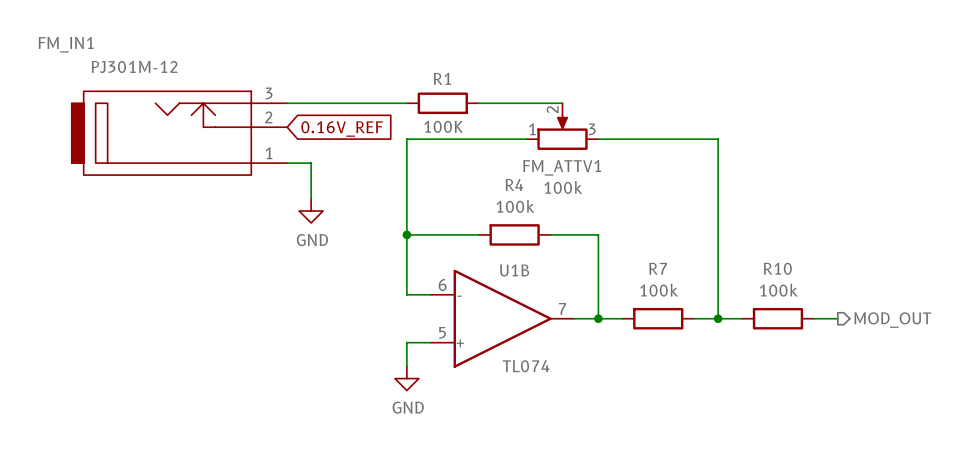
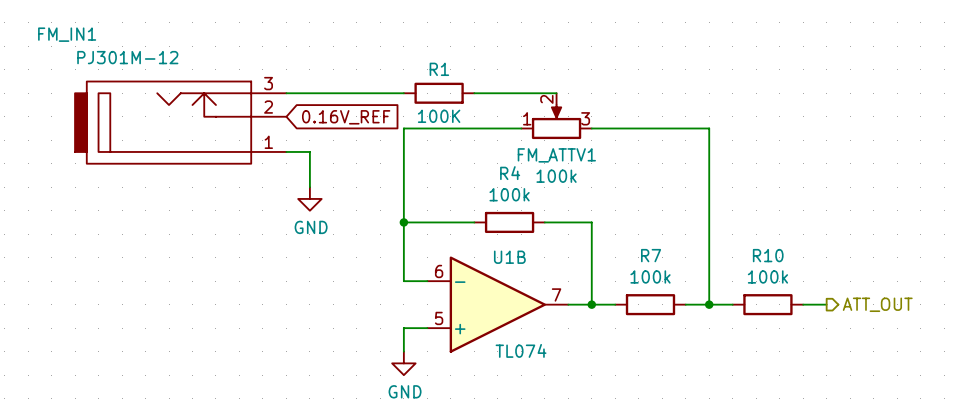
hierarchical label: MOD_OUT (892, 320) -> ATT_OUT (877, 304)

